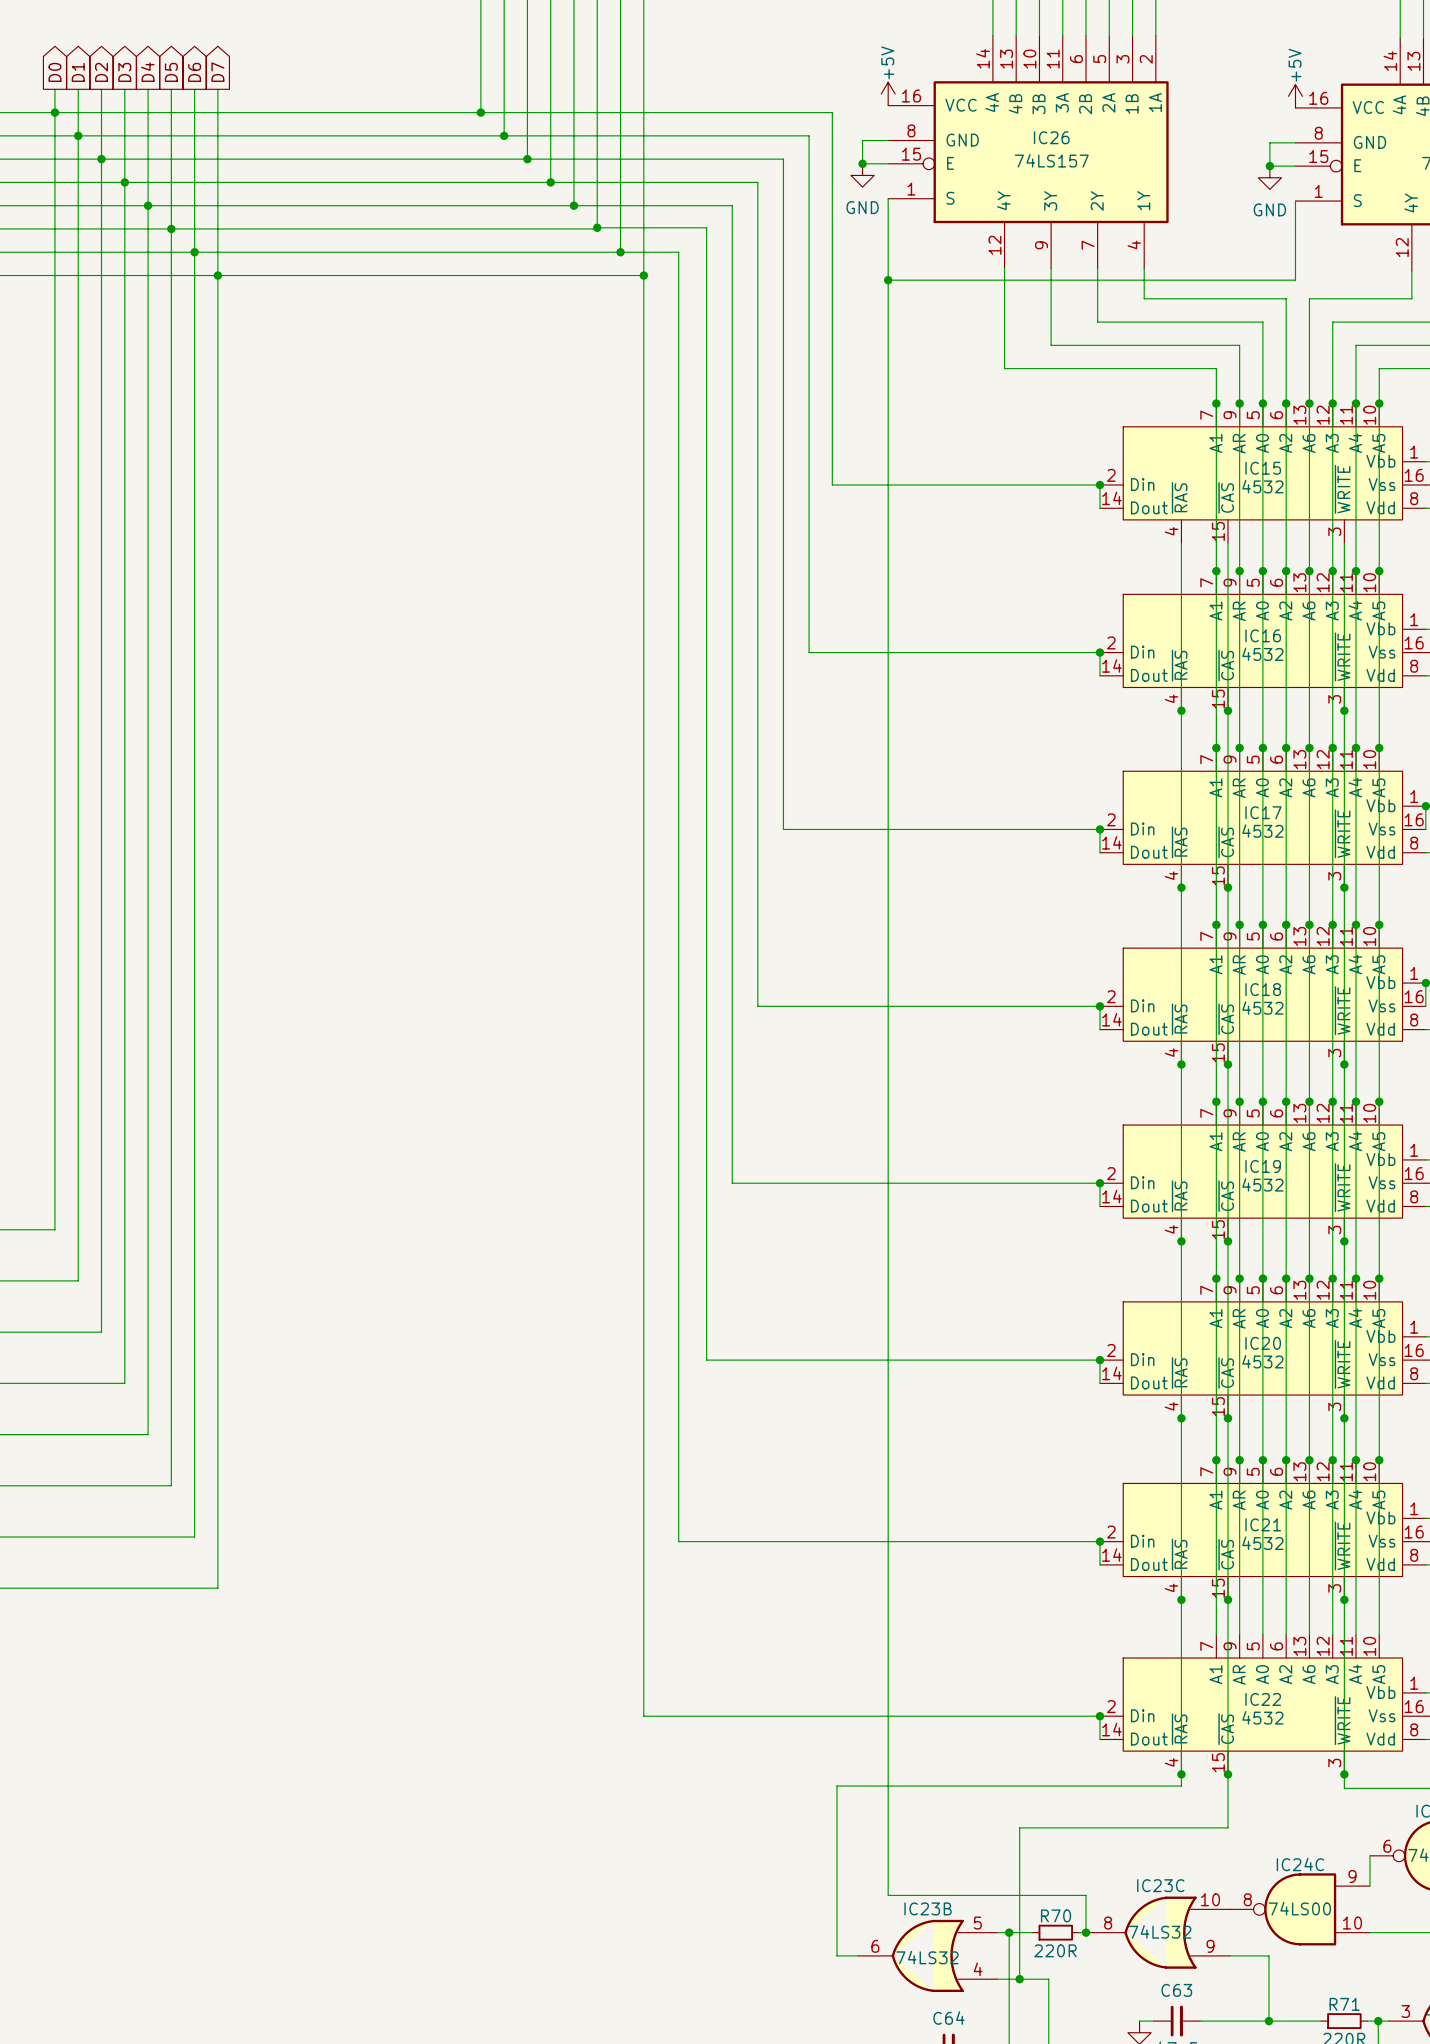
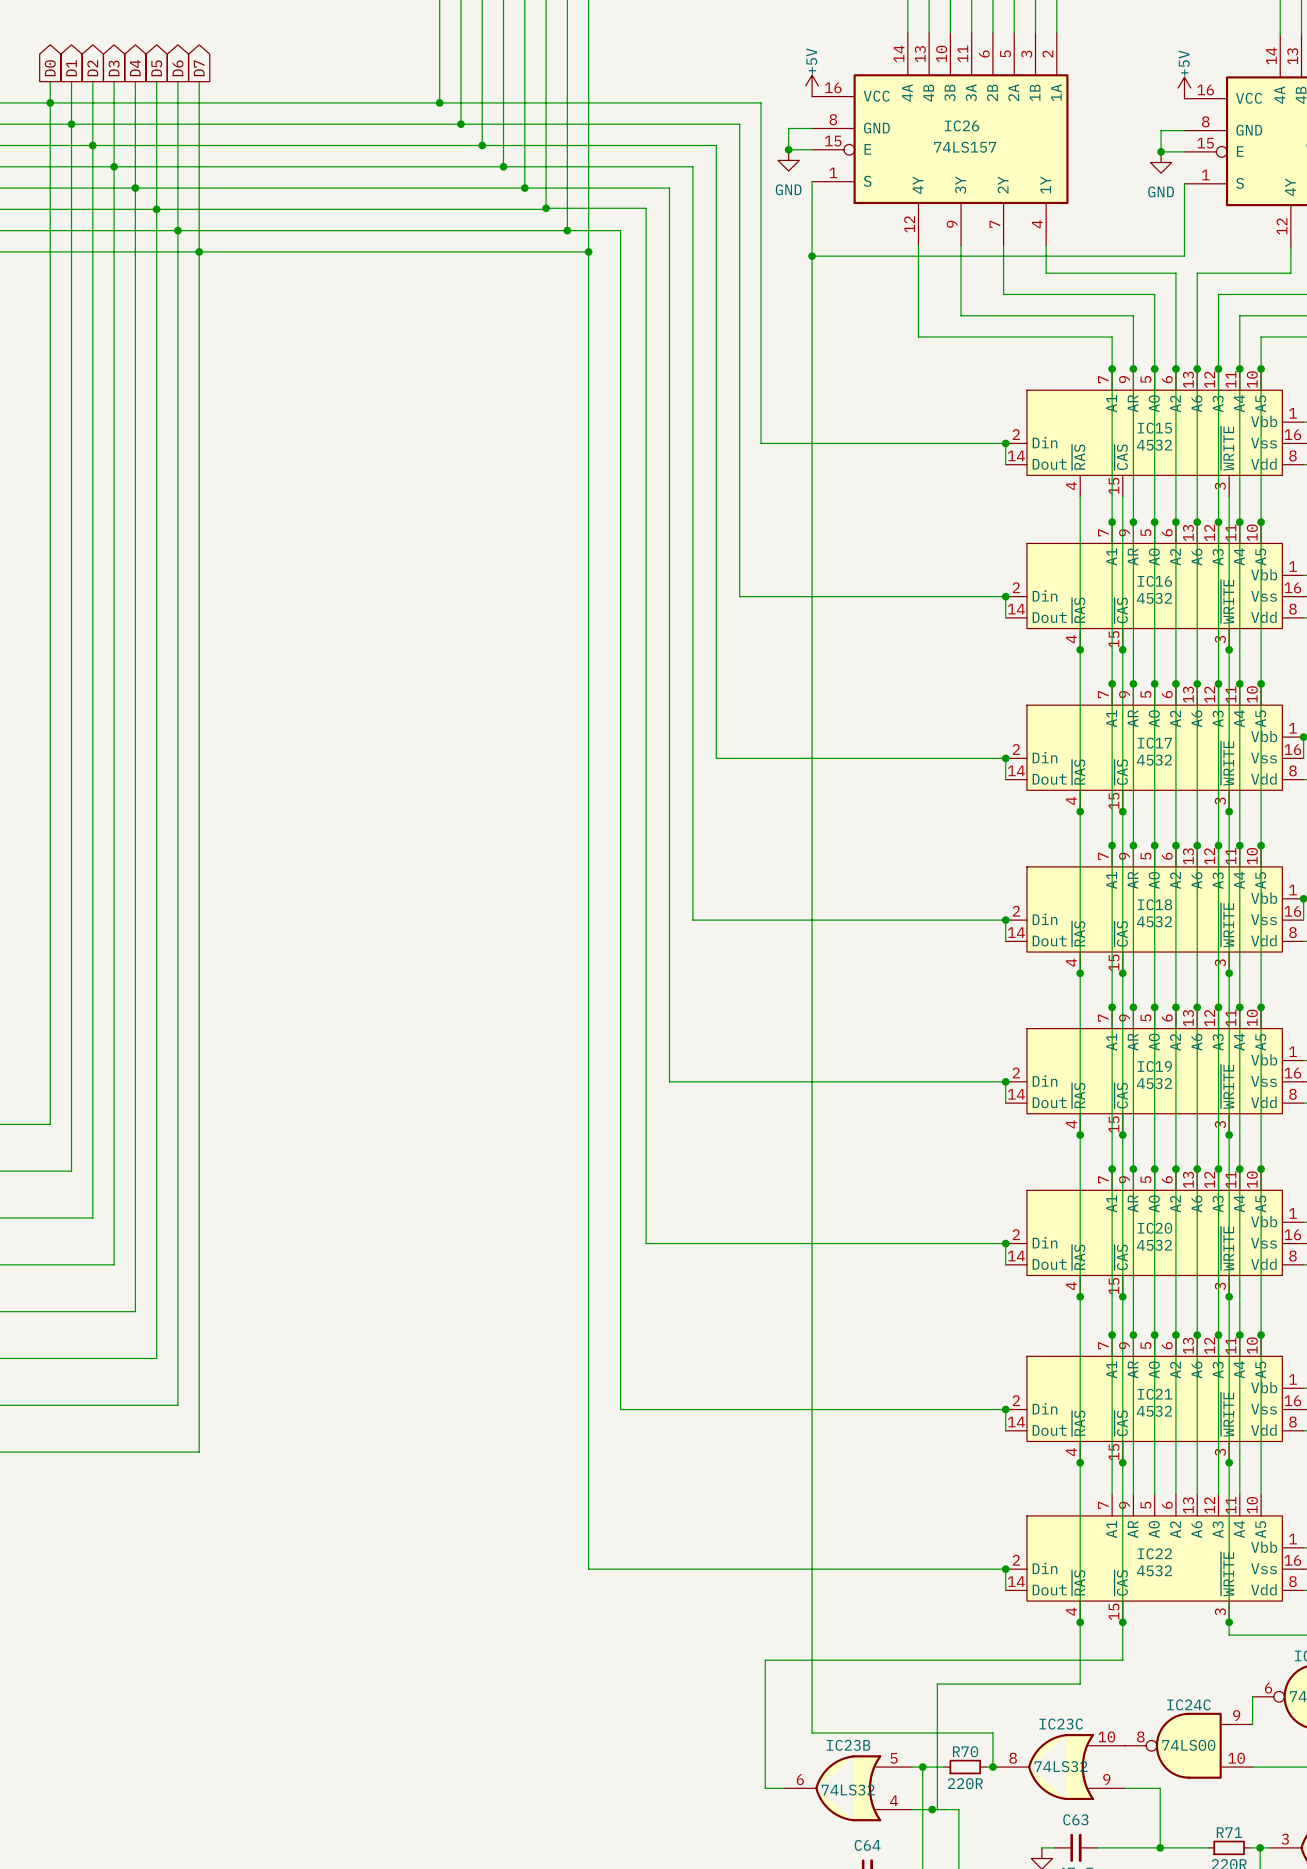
wire: (1181, 1786) (836, 1786) (837, 1815) -> (1122, 1660) (765, 1660)
wire: none -> (1080, 1632) (1080, 1684) (937, 1684) (937, 1809)
wire: (1227, 1815) (1227, 1827) (1019, 1827) (1019, 1979) -> none

